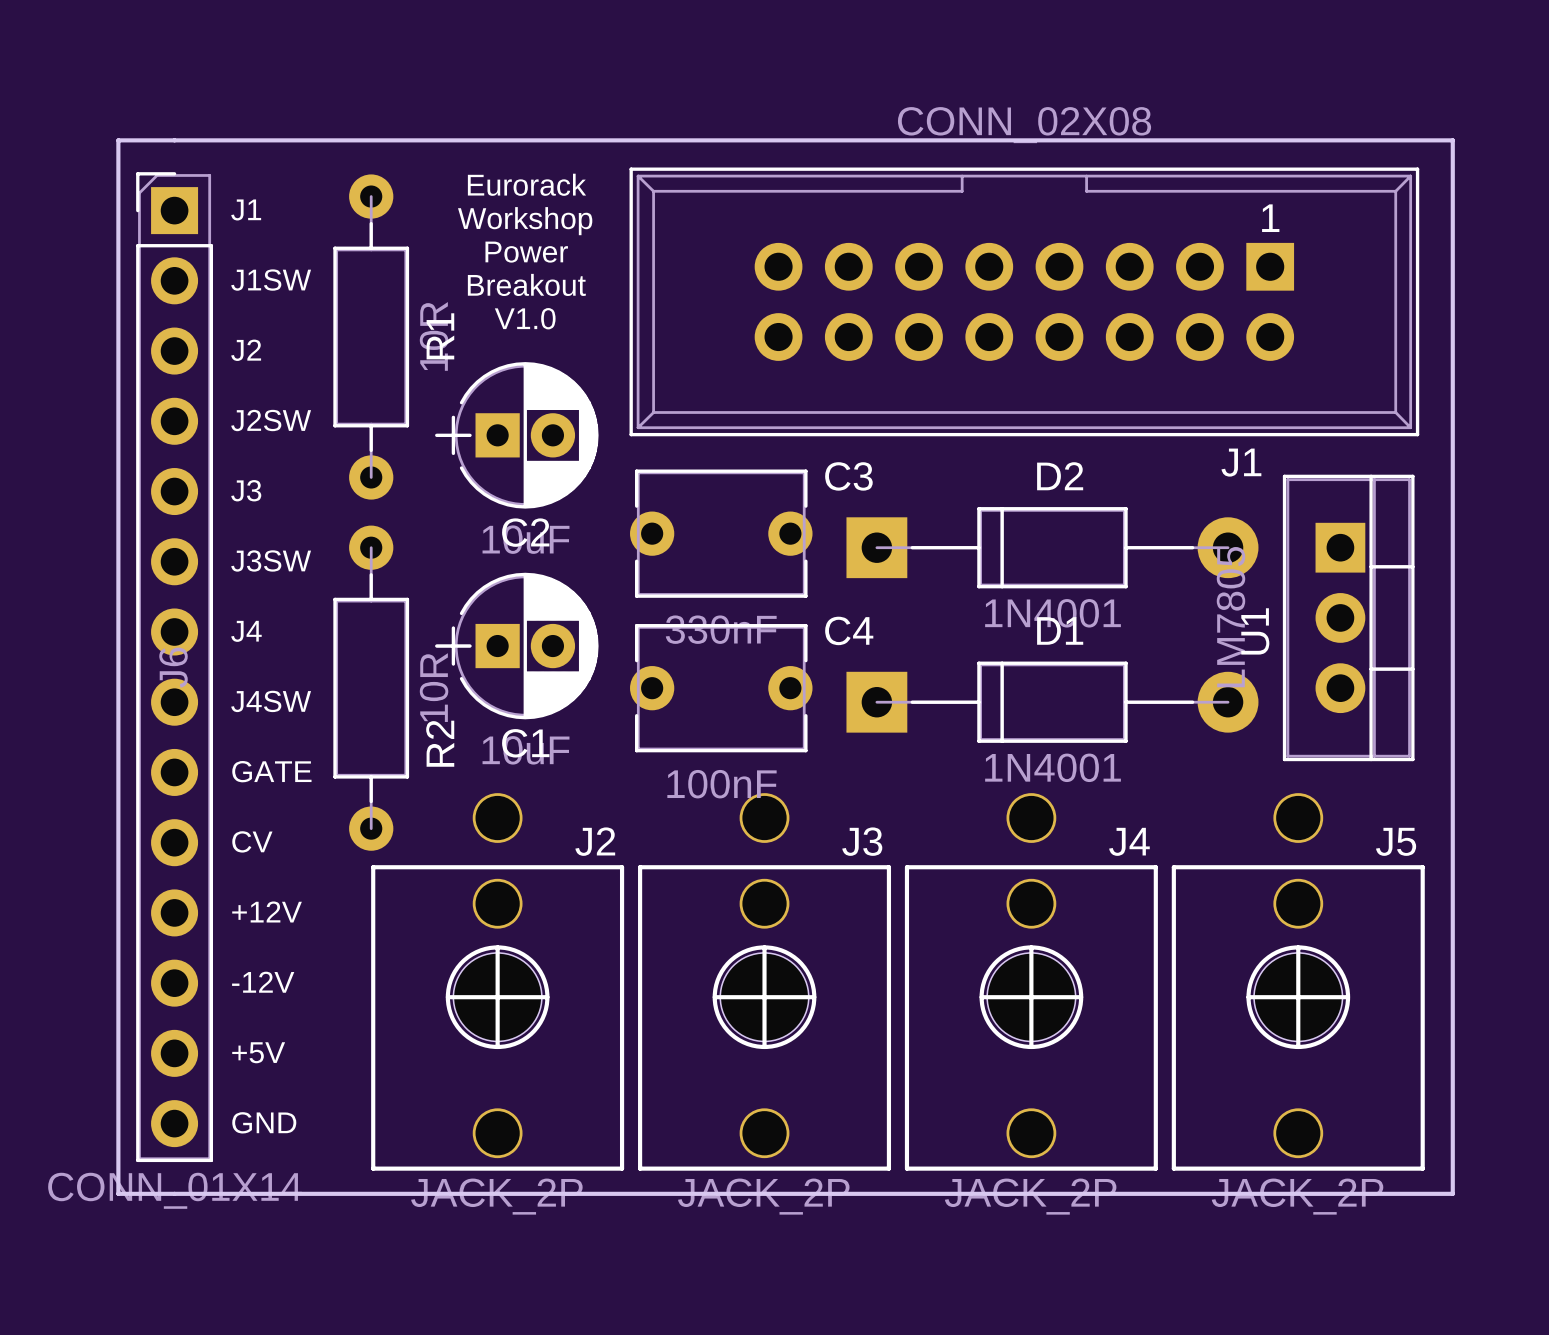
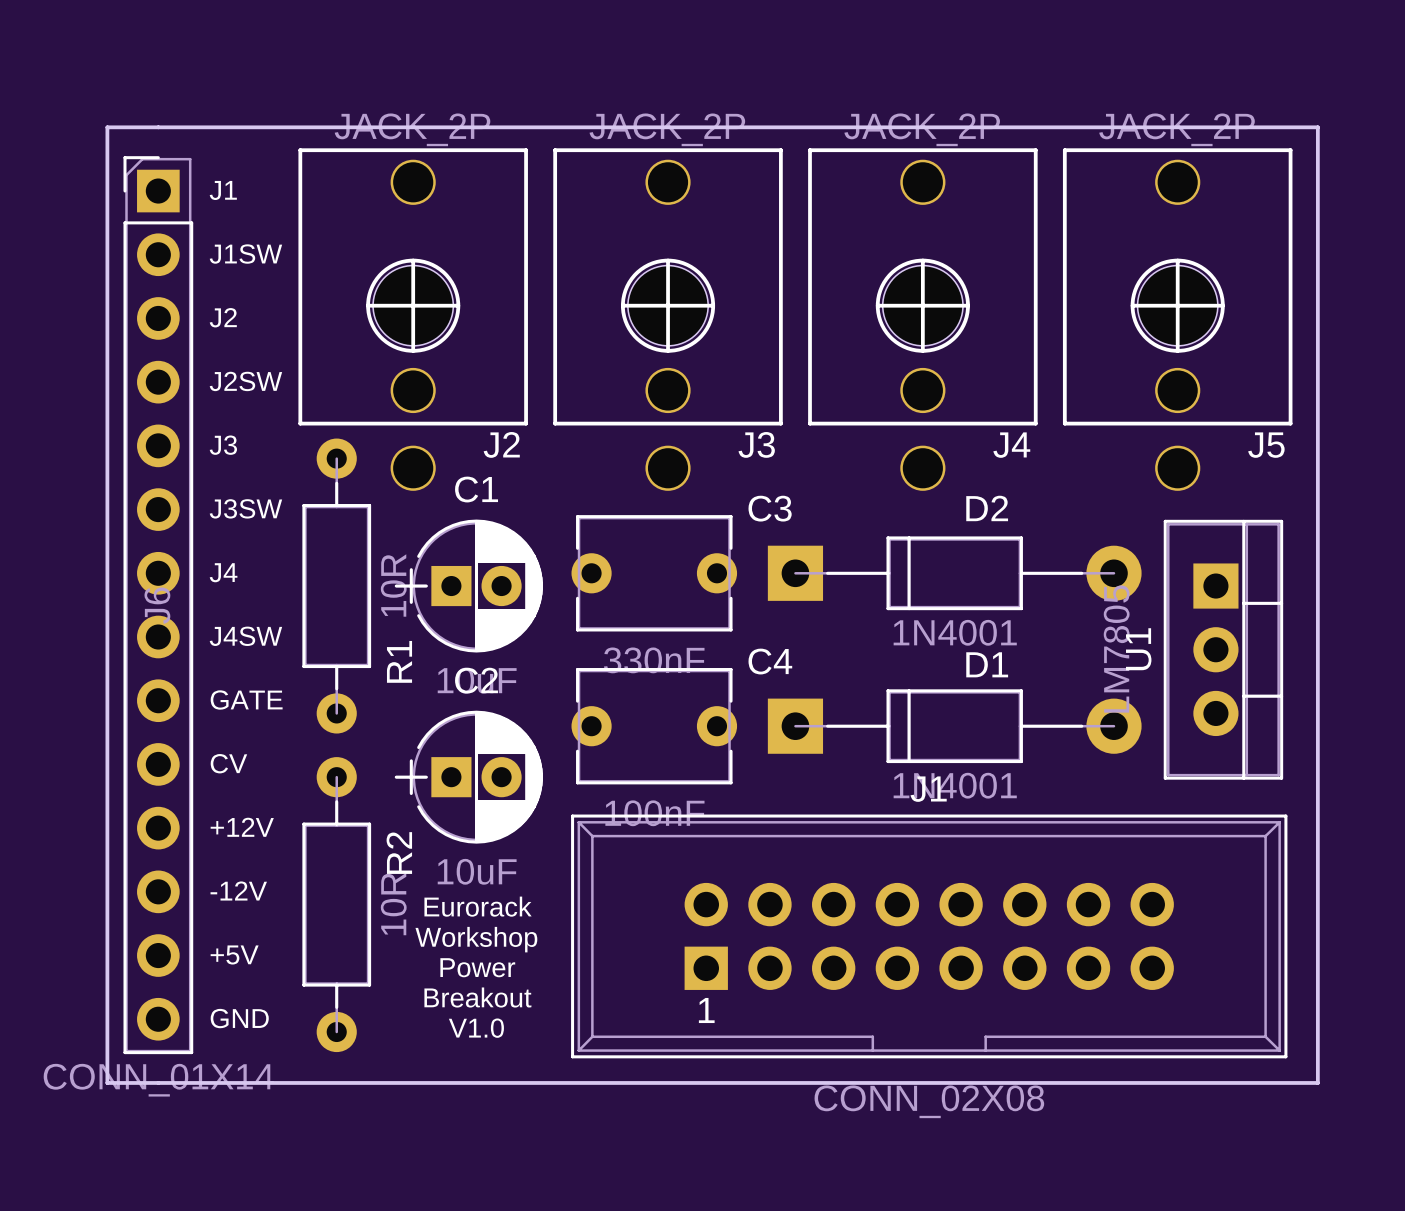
text: Eurorack (526, 184) -> none
text: Workshop (525, 221) -> none
text: Power (526, 252) -> none
text: Breakout (526, 284) -> none
J1 rotation: 0° (1024, 301) -> 180° (929, 936)
J1 position: (1024, 301) -> (929, 936)
text: V1.0 (525, 318) -> none
R1 name position: R1 (440, 336) -> R1 (399, 661)
R1 position: (371, 337) -> (336, 586)
C2 position: (516, 435) -> (468, 777)
J1 name position: J1 (1241, 462) -> J1 (928, 789)
C3 name position: C3 (848, 476) -> C3 (770, 508)
D2 name position: D2 (1060, 476) -> D2 (987, 508)
C2 name position: C2 (525, 532) -> C2 (476, 680)
C3 position: (721, 533) -> (654, 573)
D2 position: (1052, 547) -> (954, 573)
U1 position: (1348, 617) -> (1223, 649)
C4 name position: C4 (849, 630) -> C4 (770, 661)
D1 name position: D1 (1060, 630) -> D1 (987, 664)
U1 name position: U1 (1255, 631) -> U1 (1138, 649)
R2 position: (371, 688) -> (336, 904)
C4 position: (721, 688) -> (654, 726)
D1 position: (1052, 702) -> (954, 726)
R2 name position: R2 (440, 743) -> R2 (399, 853)
C1 name position: C1 (525, 743) -> C1 (476, 489)
J2 name position: J2 (595, 841) -> J2 (501, 444)
J3 name position: J3 (862, 841) -> J3 (756, 444)
J4 name position: J4 (1129, 841) -> J4 (1011, 445)
J5 name position: J5 (1396, 841) -> J5 (1266, 445)
J2 rotation: 0° (497, 981) -> 180° (413, 319)
J2 position: (497, 981) -> (413, 319)
J3 rotation: 0° (764, 981) -> 180° (668, 319)
J3 position: (764, 981) -> (668, 319)
J4 rotation: 0° (1031, 981) -> 180° (922, 319)
J4 position: (1031, 981) -> (922, 319)
J5 rotation: 0° (1298, 981) -> 180° (1177, 319)
J5 position: (1298, 981) -> (1177, 319)
text: none -> Eurorack (478, 906)
text: none -> Workshop (476, 939)
text: none -> Power (477, 967)
text: none -> Breakout (477, 997)
text: none -> V1.0 (476, 1028)

